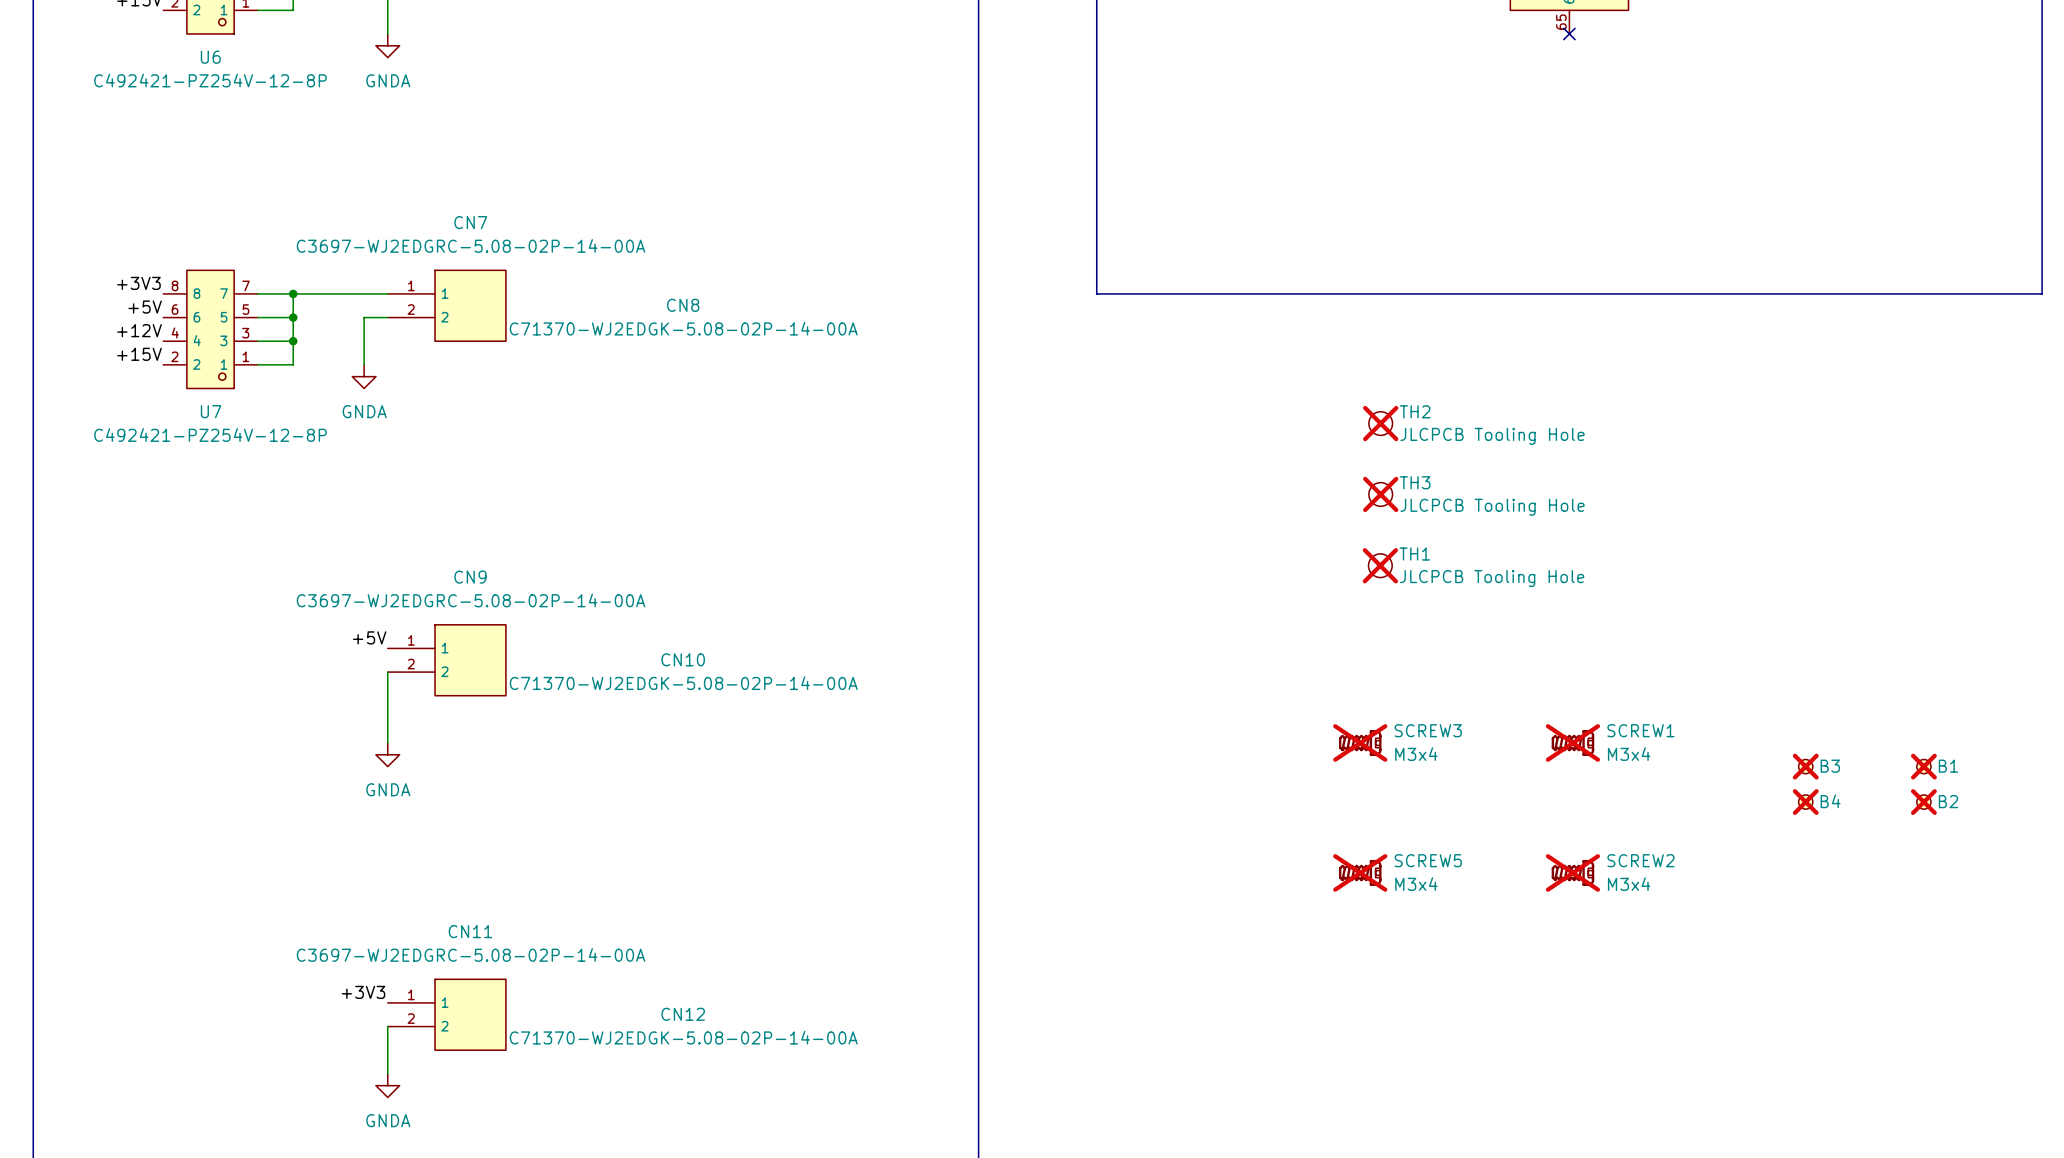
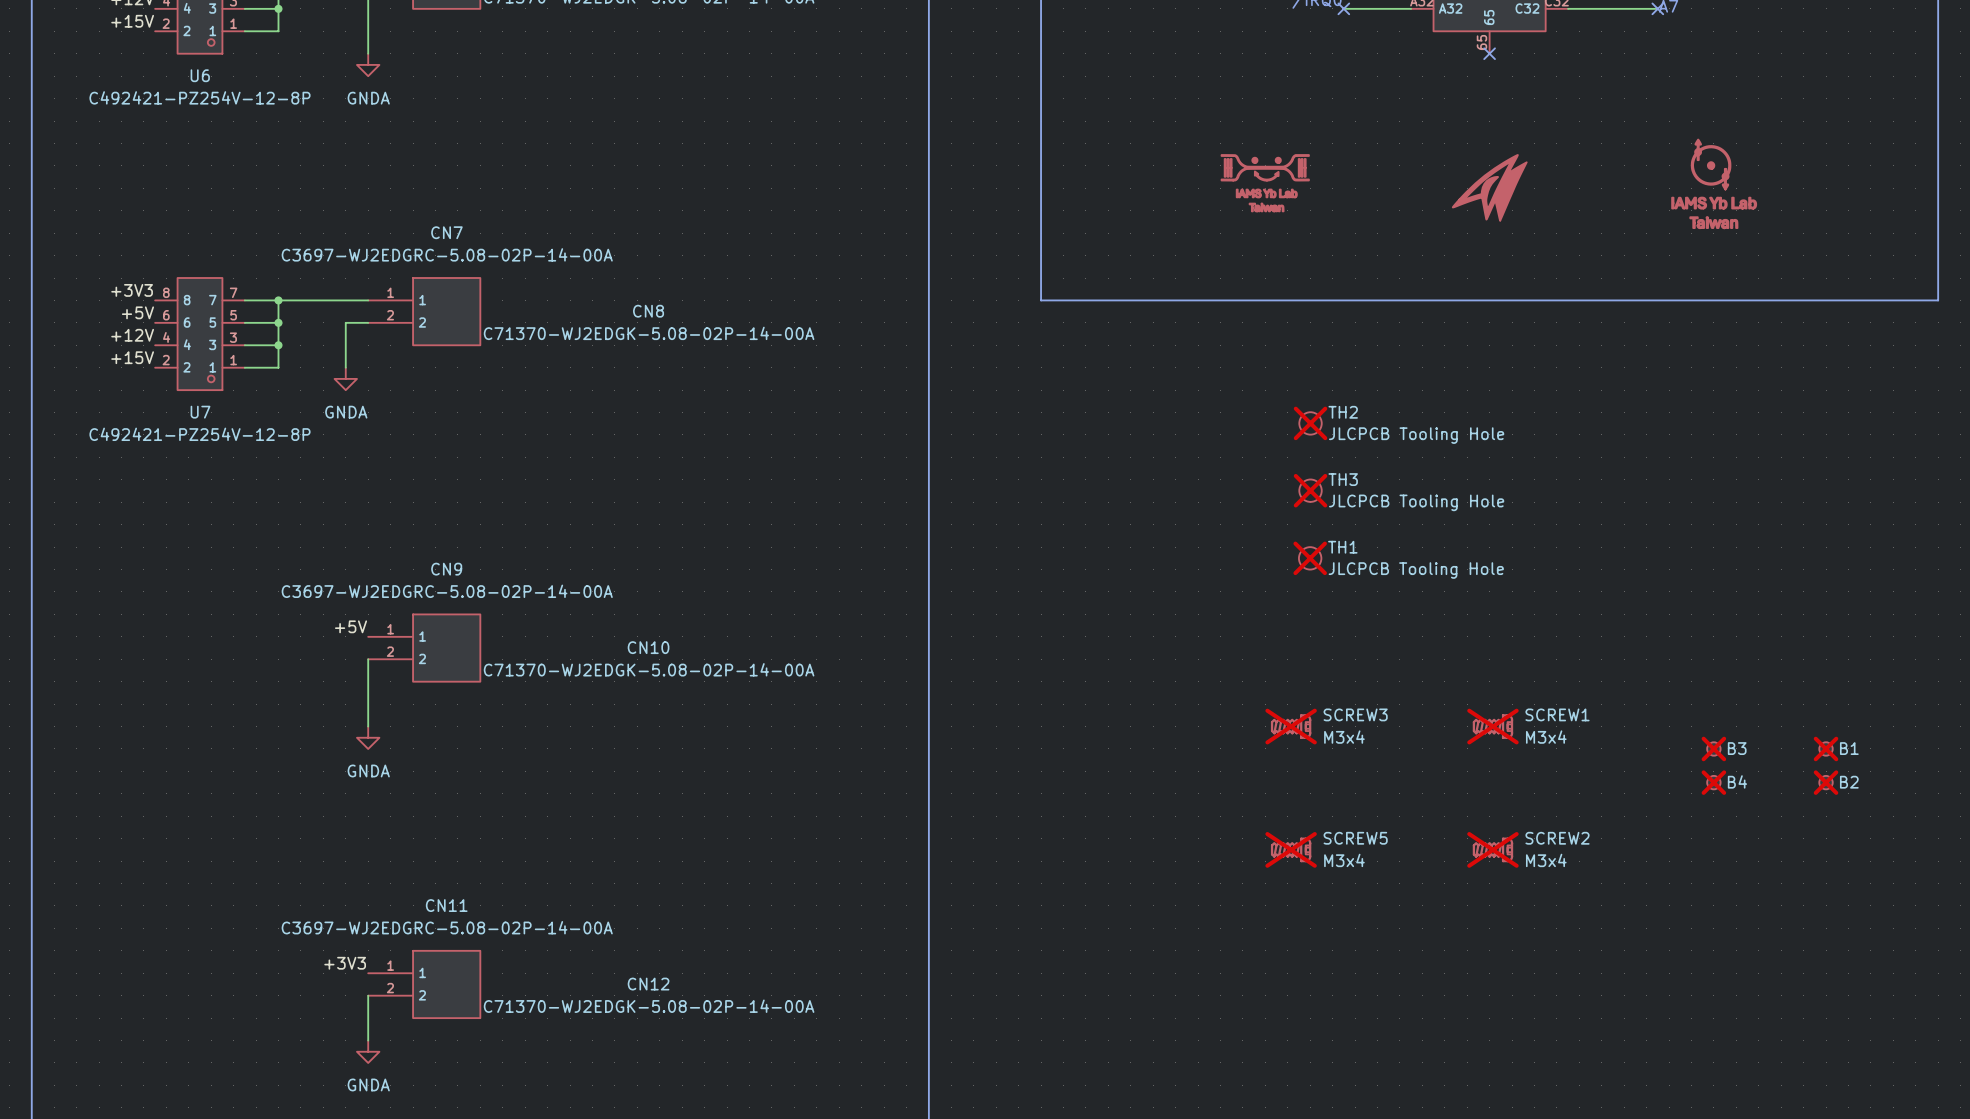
part: none -> (1265, 183)
part: none -> (1714, 183)
part: none -> (1489, 187)

